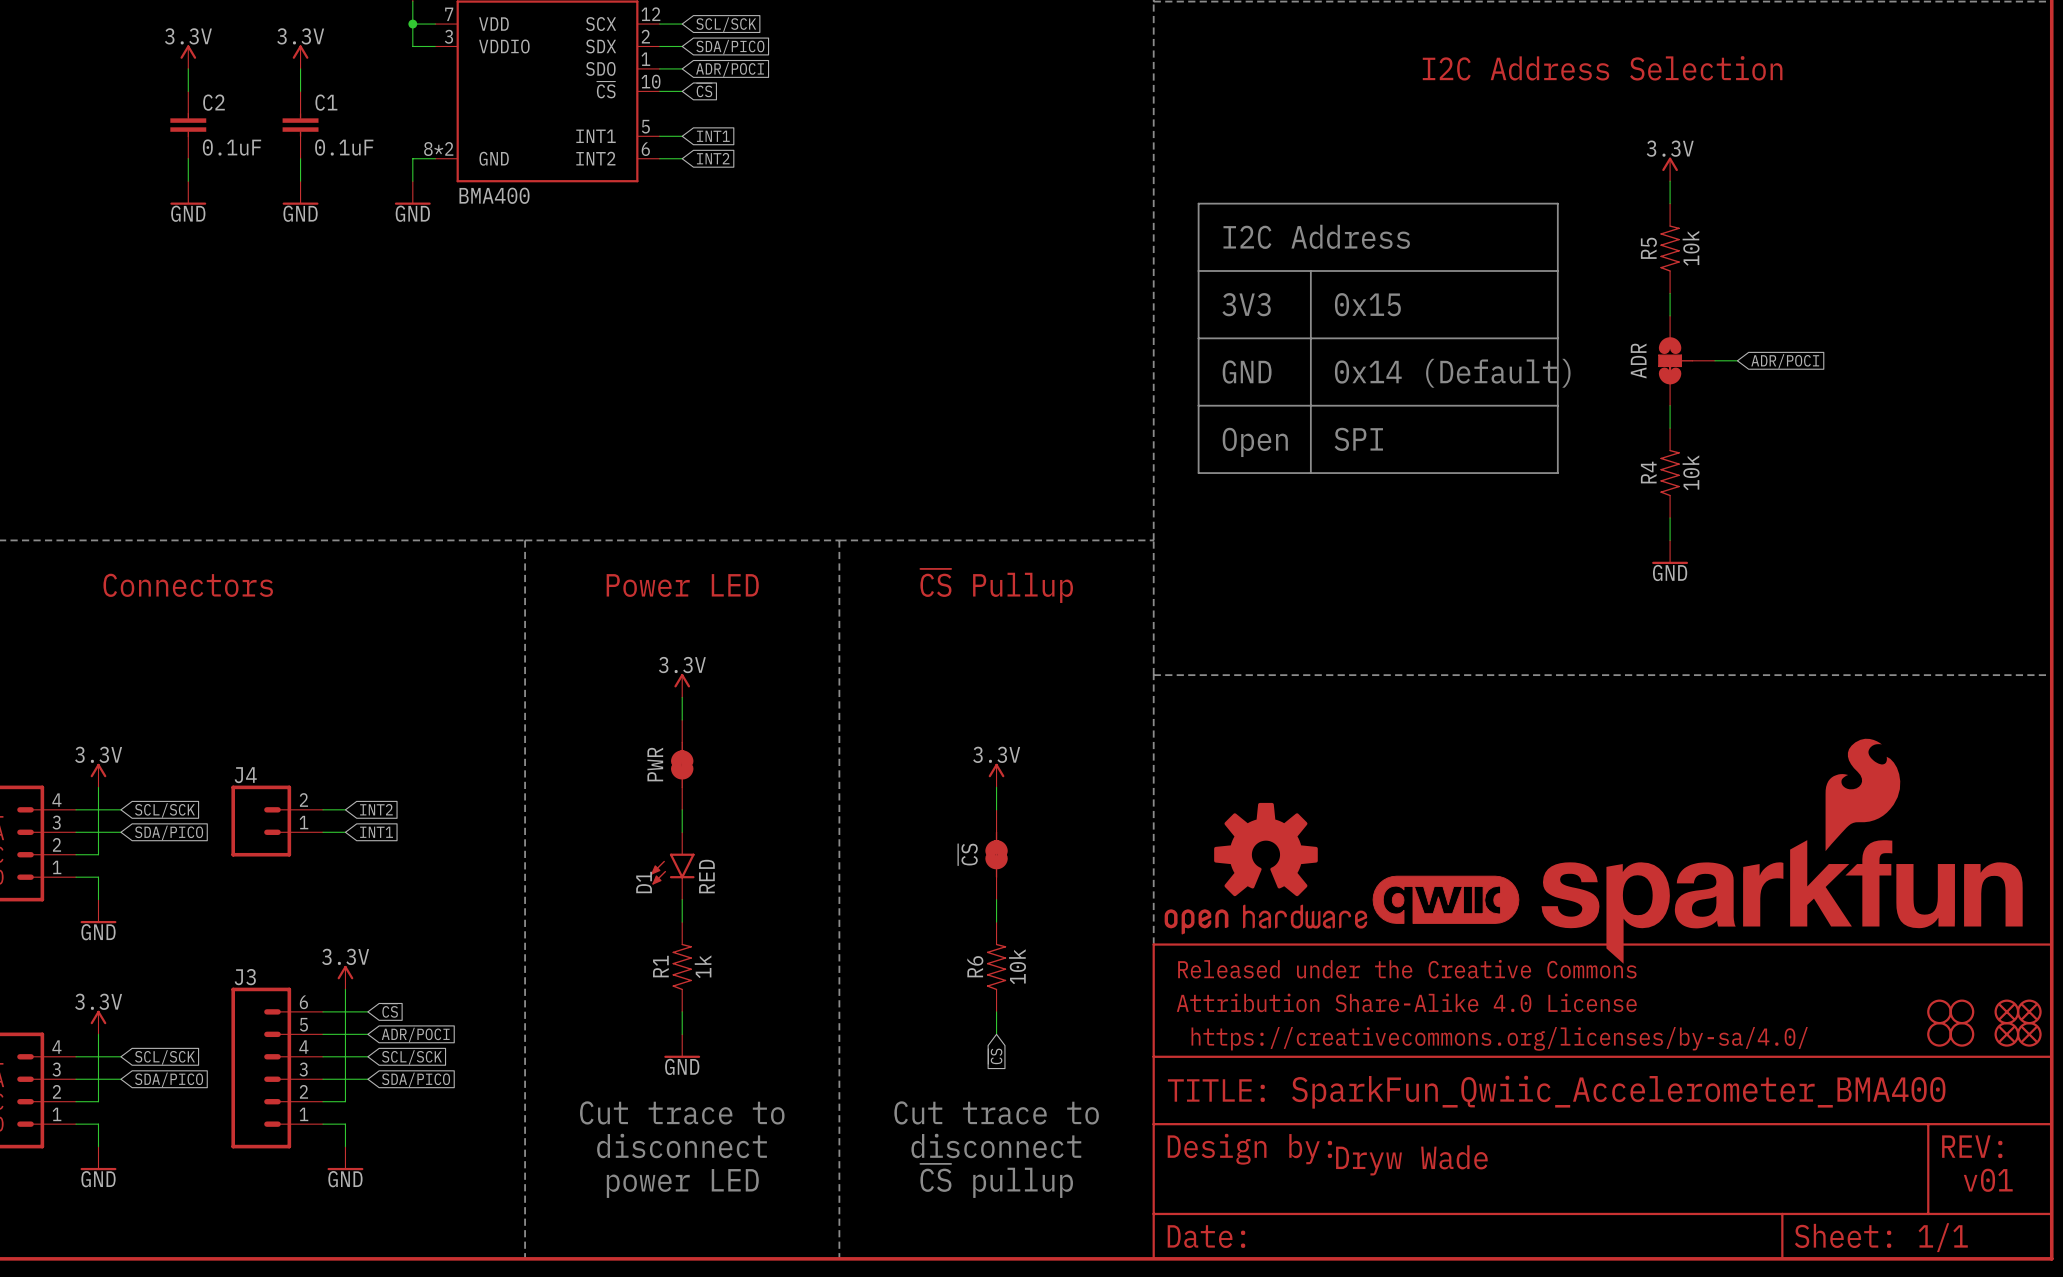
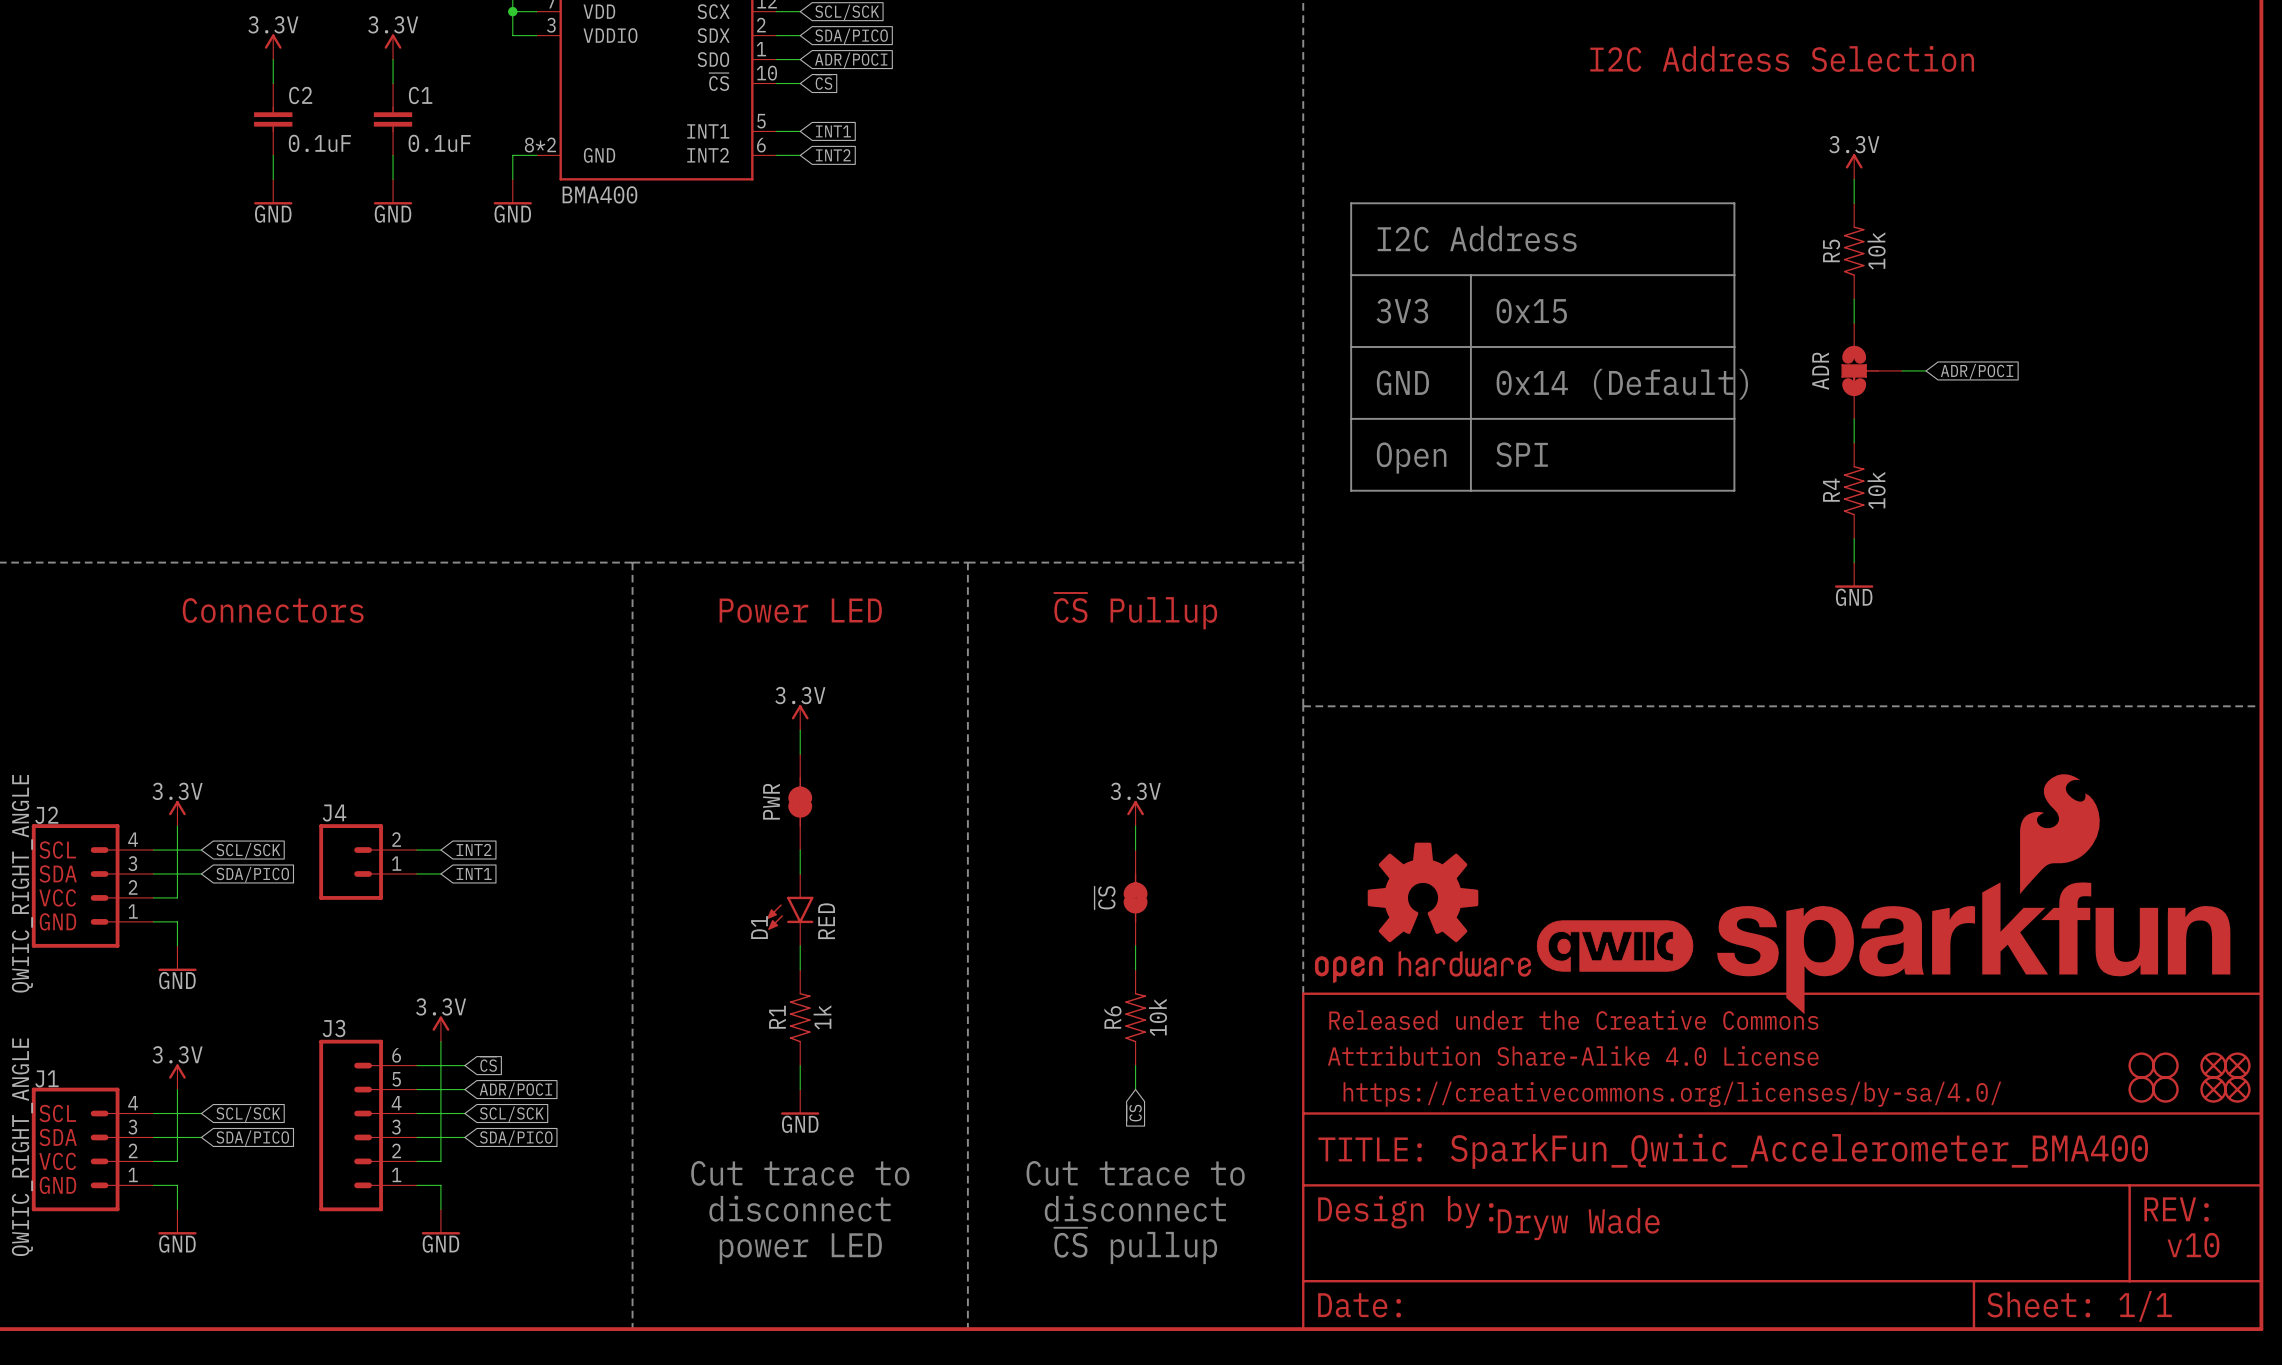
text: v01 (1988, 1180) -> v10 (2193, 1245)

